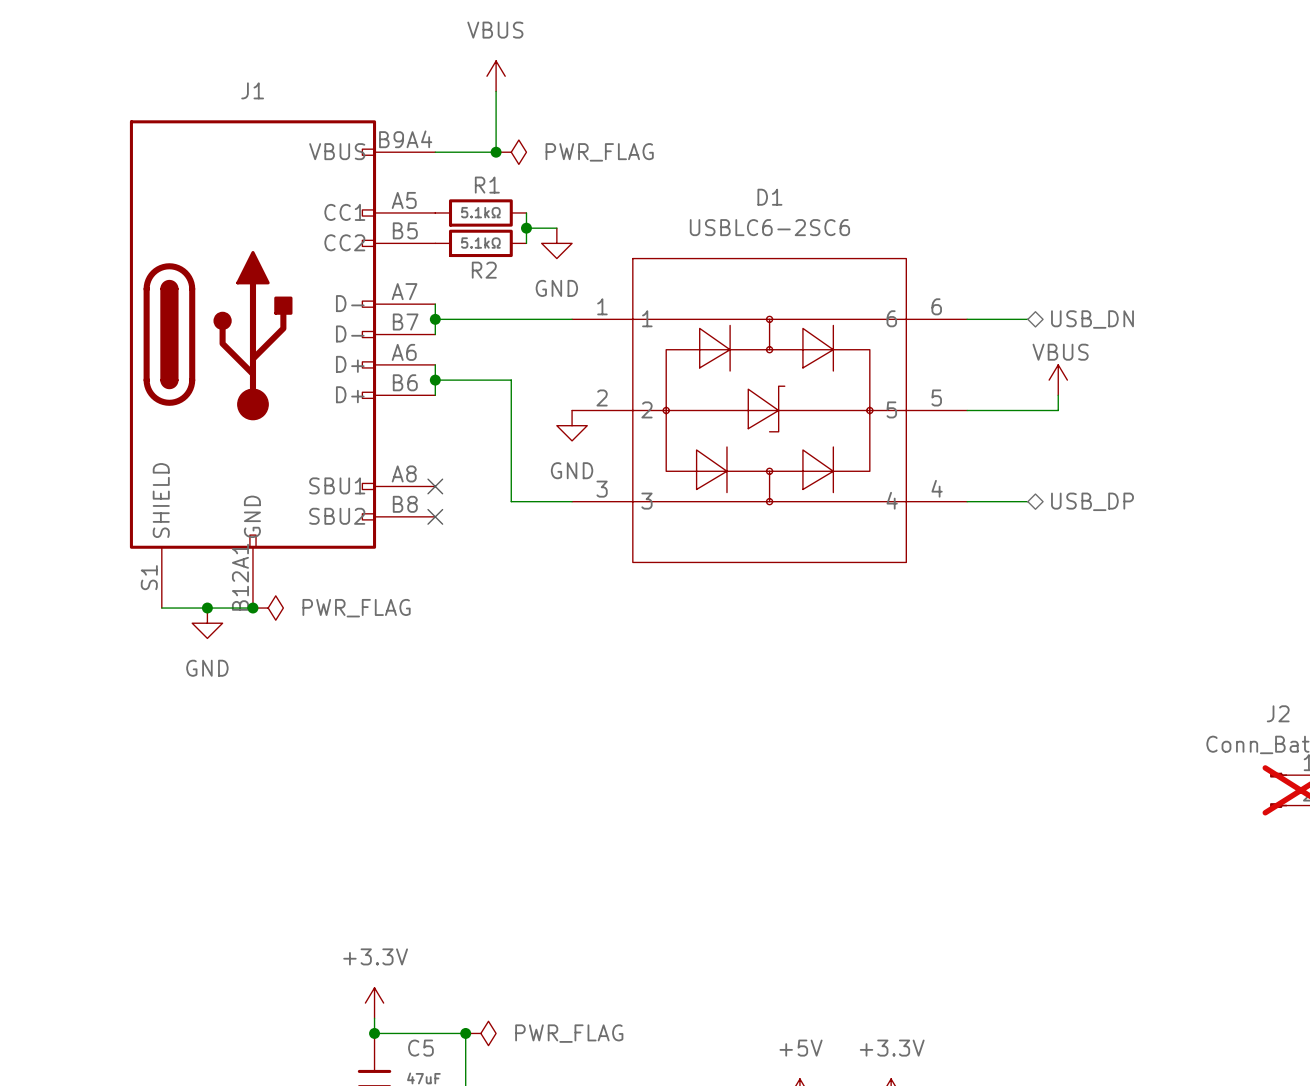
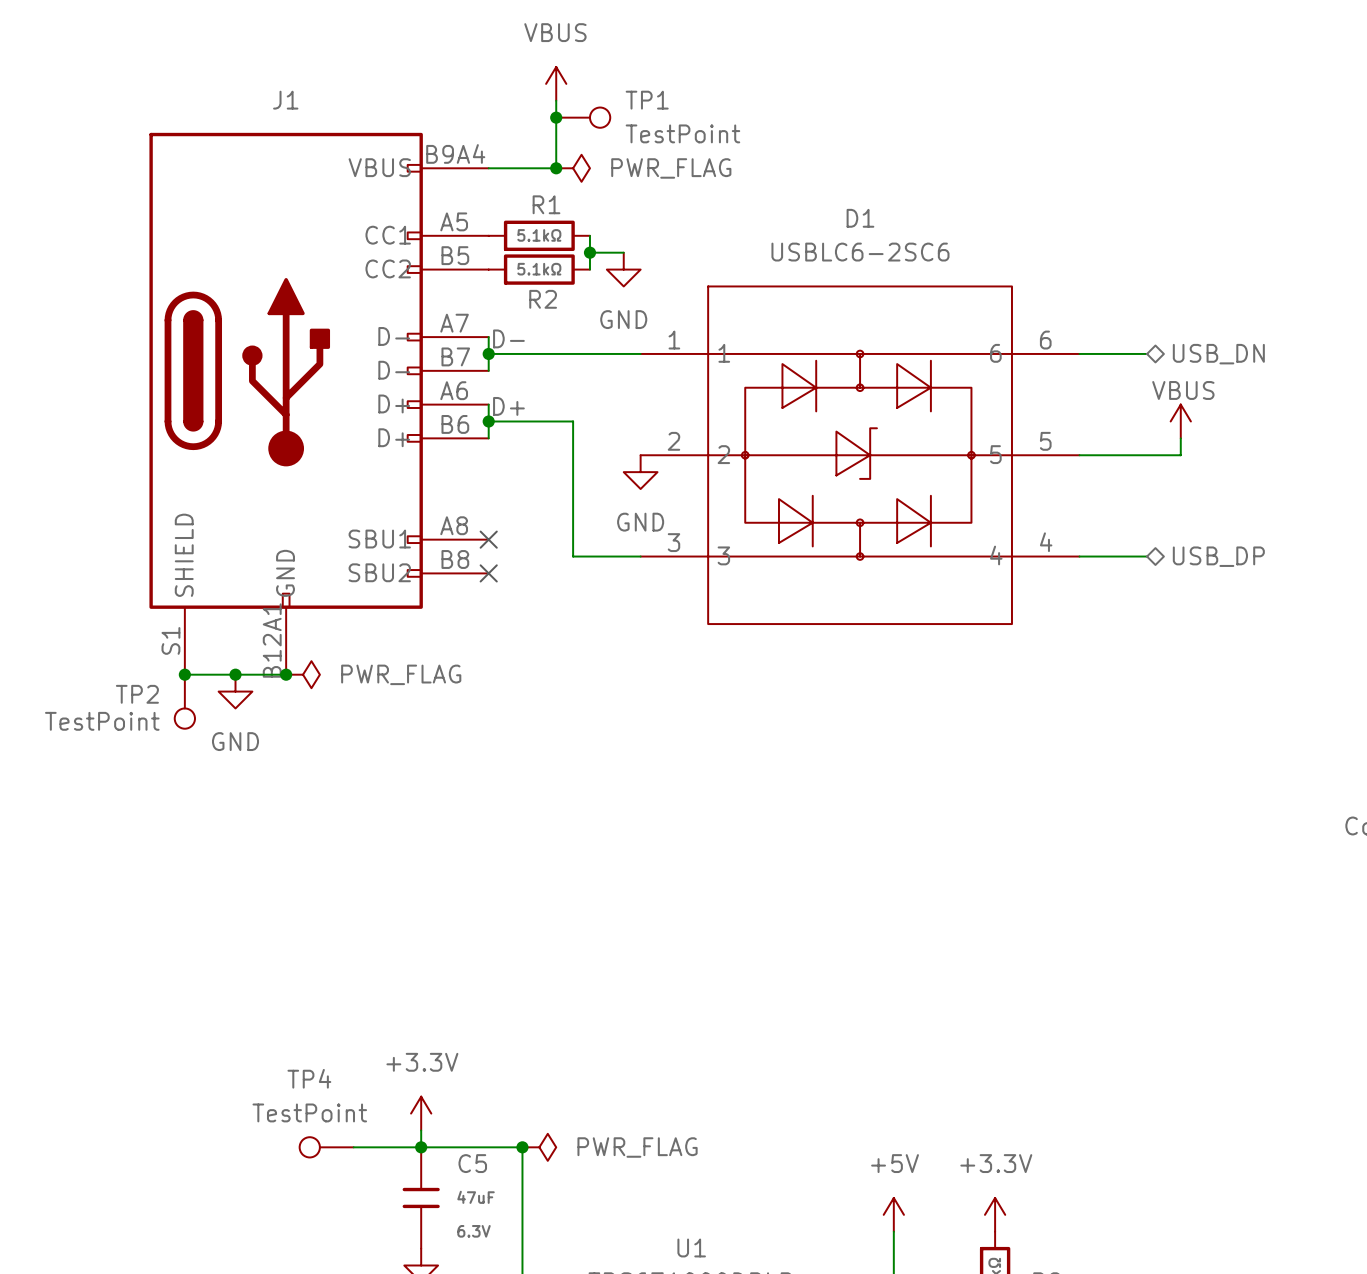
junction: none -> (556, 117)
TP1: none -> TestPoint (583, 117)
label: none -> D- (508, 338)
label: none -> D+ (508, 406)
junction: none -> (184, 674)
TP2: none -> TestPoint (184, 701)
TP4: none -> TestPoint (326, 1147)
wire: none -> (353, 1147) (421, 1147)

